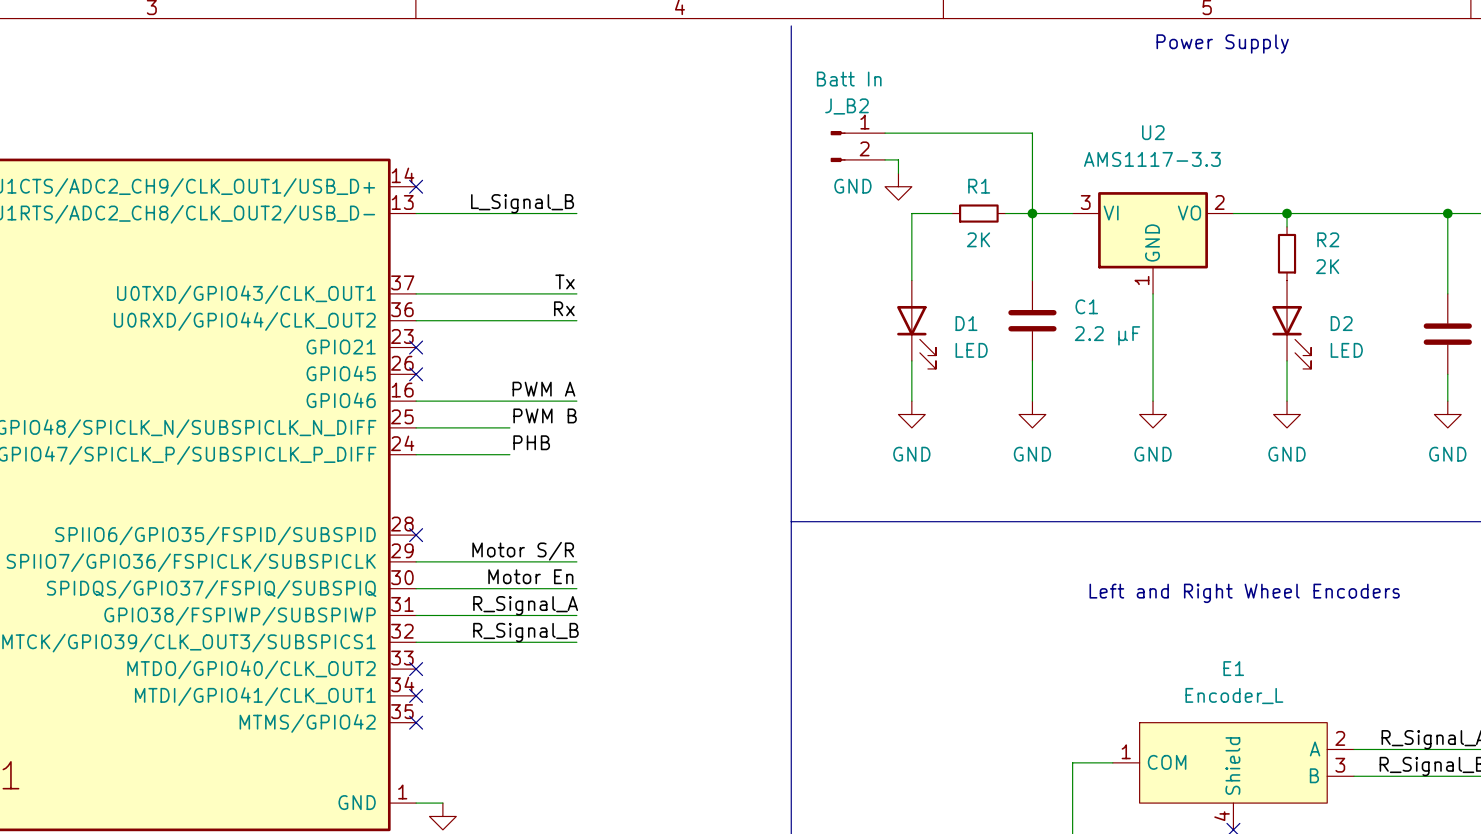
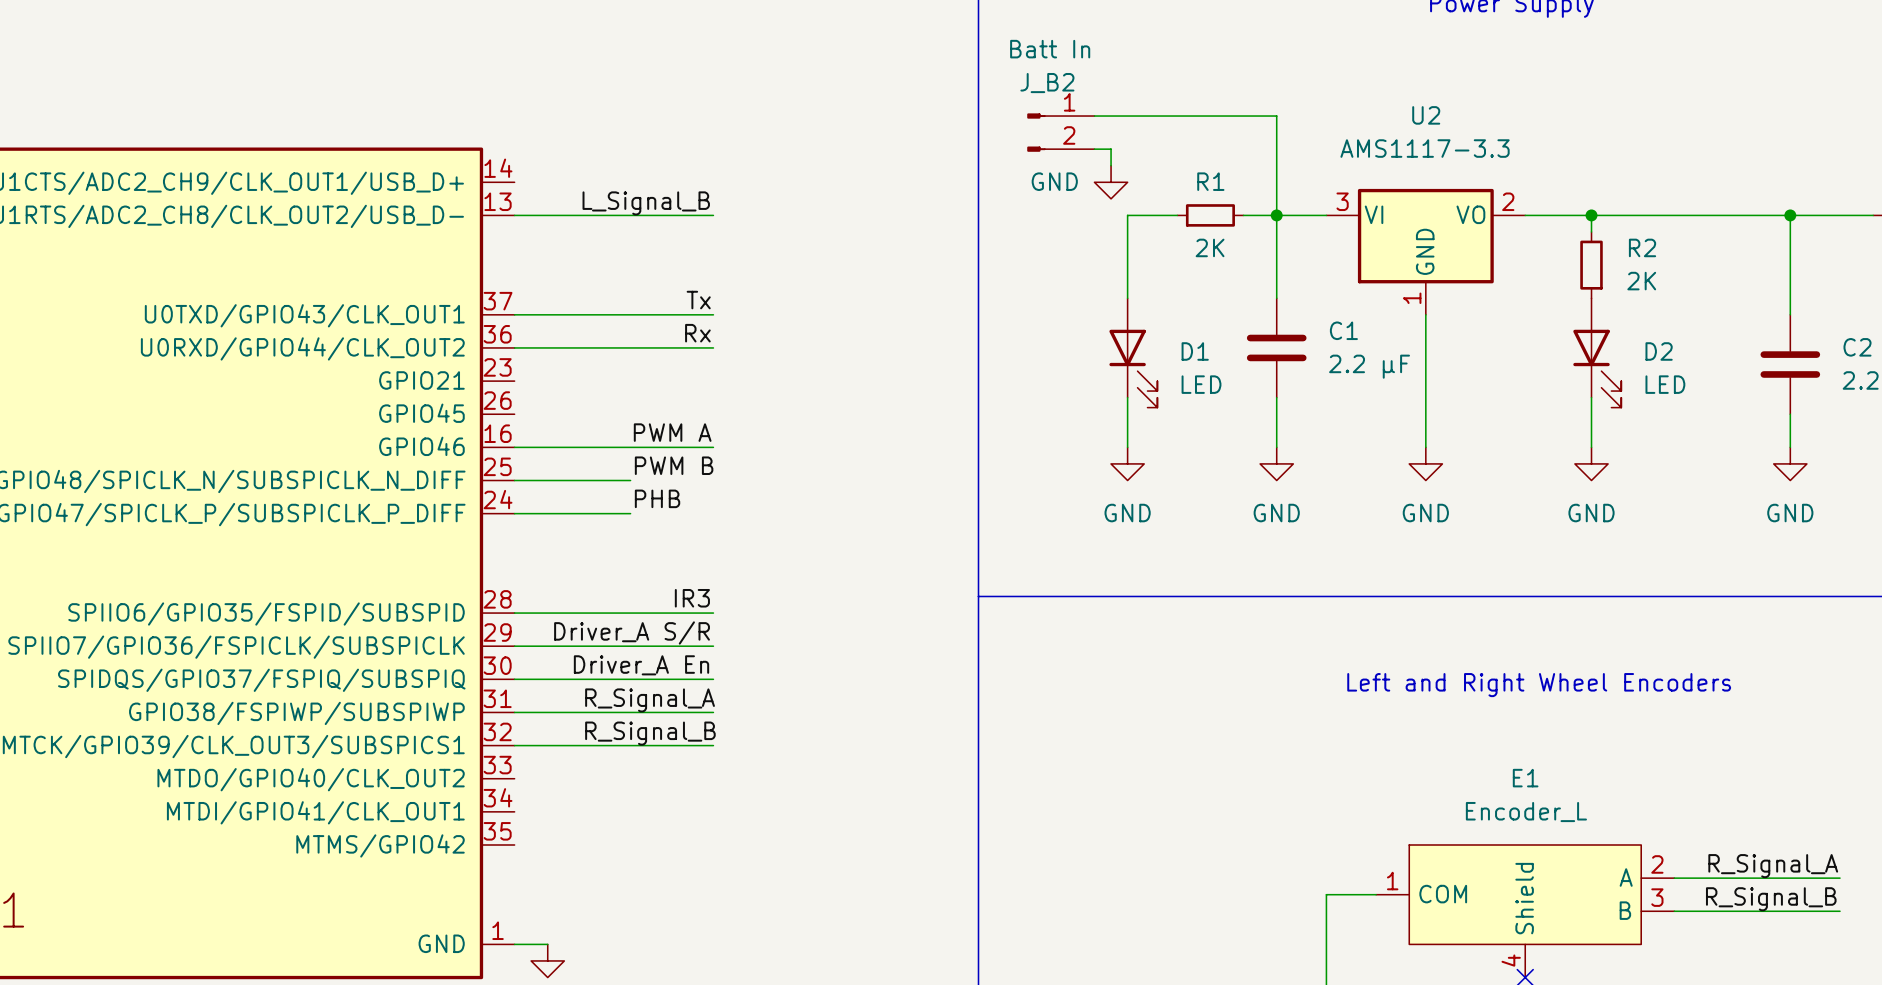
no-connect mark: (416, 186) -> none
no-connect mark: (416, 347) -> none
no-connect mark: (416, 374) -> none
label: none -> IR3 (692, 598)
wire: none -> (514, 613) (713, 613)
no-connect mark: (416, 535) -> none
label: Motor S/R (523, 551) -> Driver_A S/R (632, 632)
label: Motor En (530, 576) -> Driver_A En (641, 665)
no-connect mark: (416, 669) -> none
no-connect mark: (416, 695) -> none
no-connect mark: (416, 722) -> none

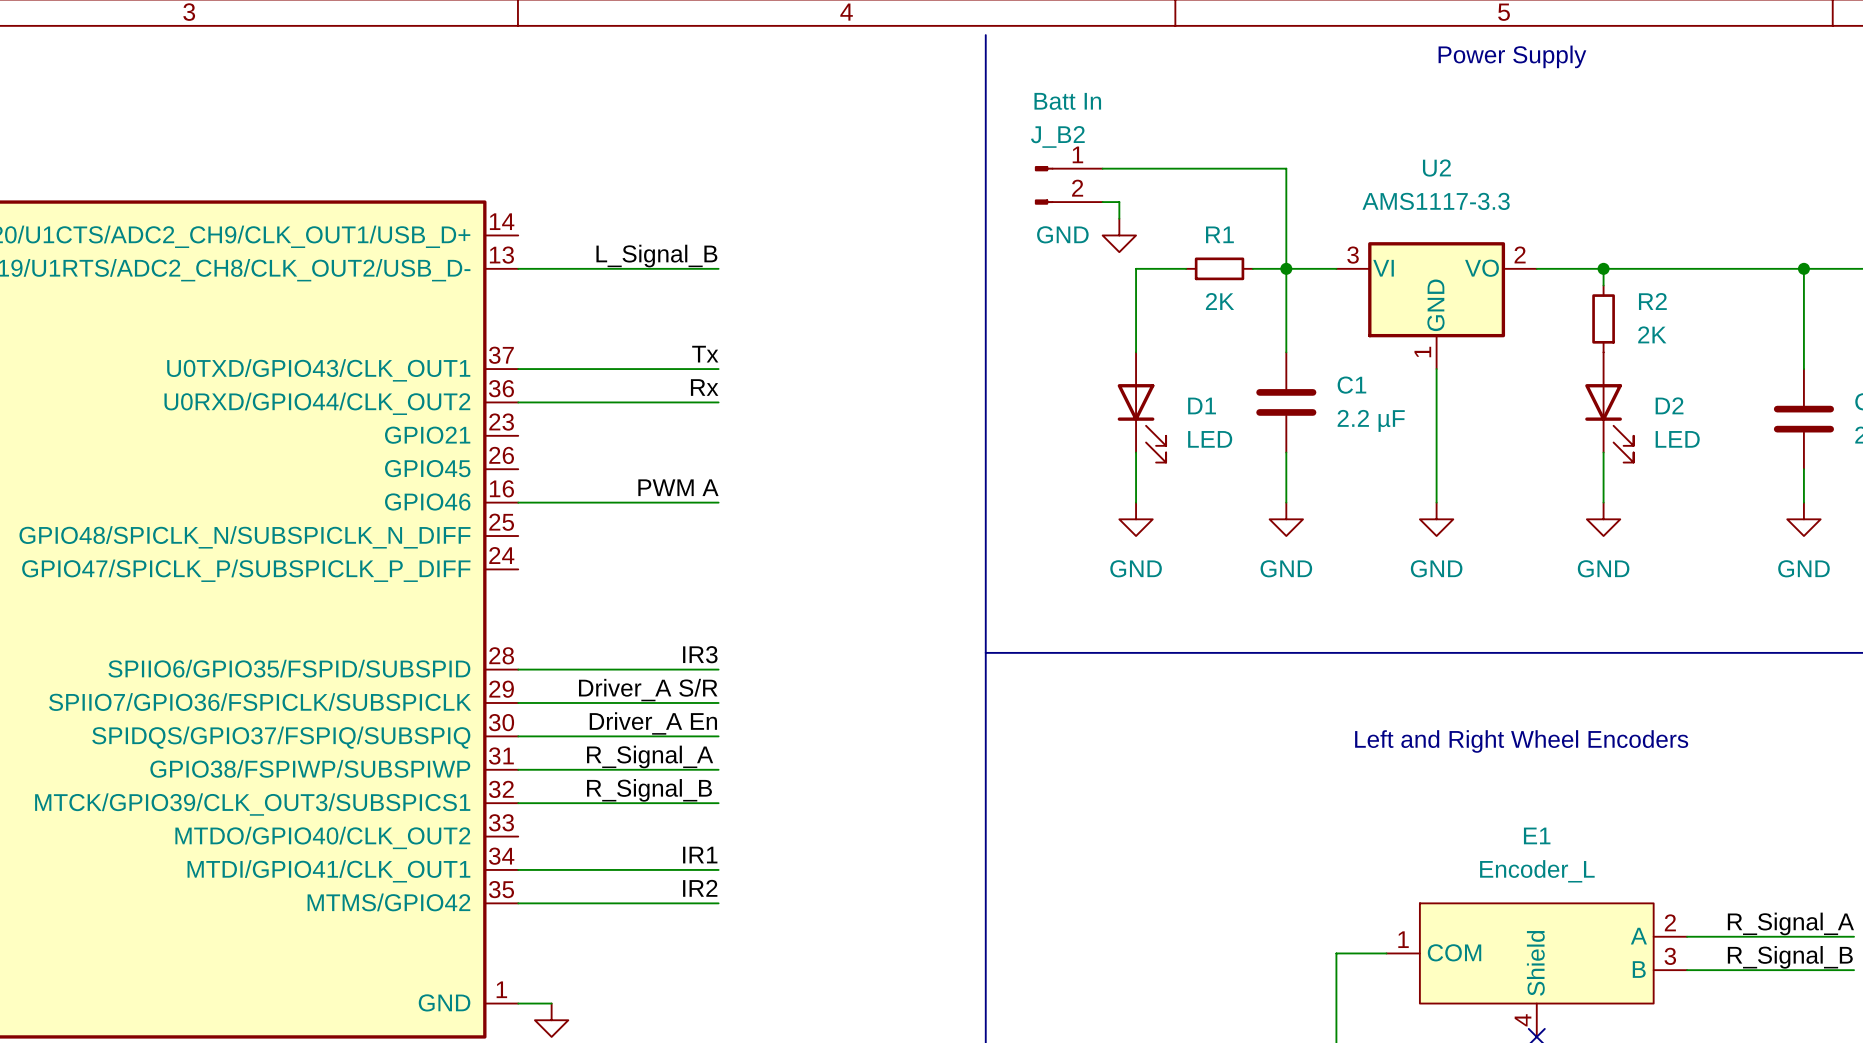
label: PWM B (674, 465) -> none
wire: (514, 480) (630, 480) -> none
label: PHB (657, 498) -> none
wire: (514, 513) (630, 513) -> none
label: none -> IR1 (700, 855)
wire: none -> (518, 869) (718, 869)
label: none -> IR2 (700, 888)
wire: none -> (518, 903) (718, 903)

